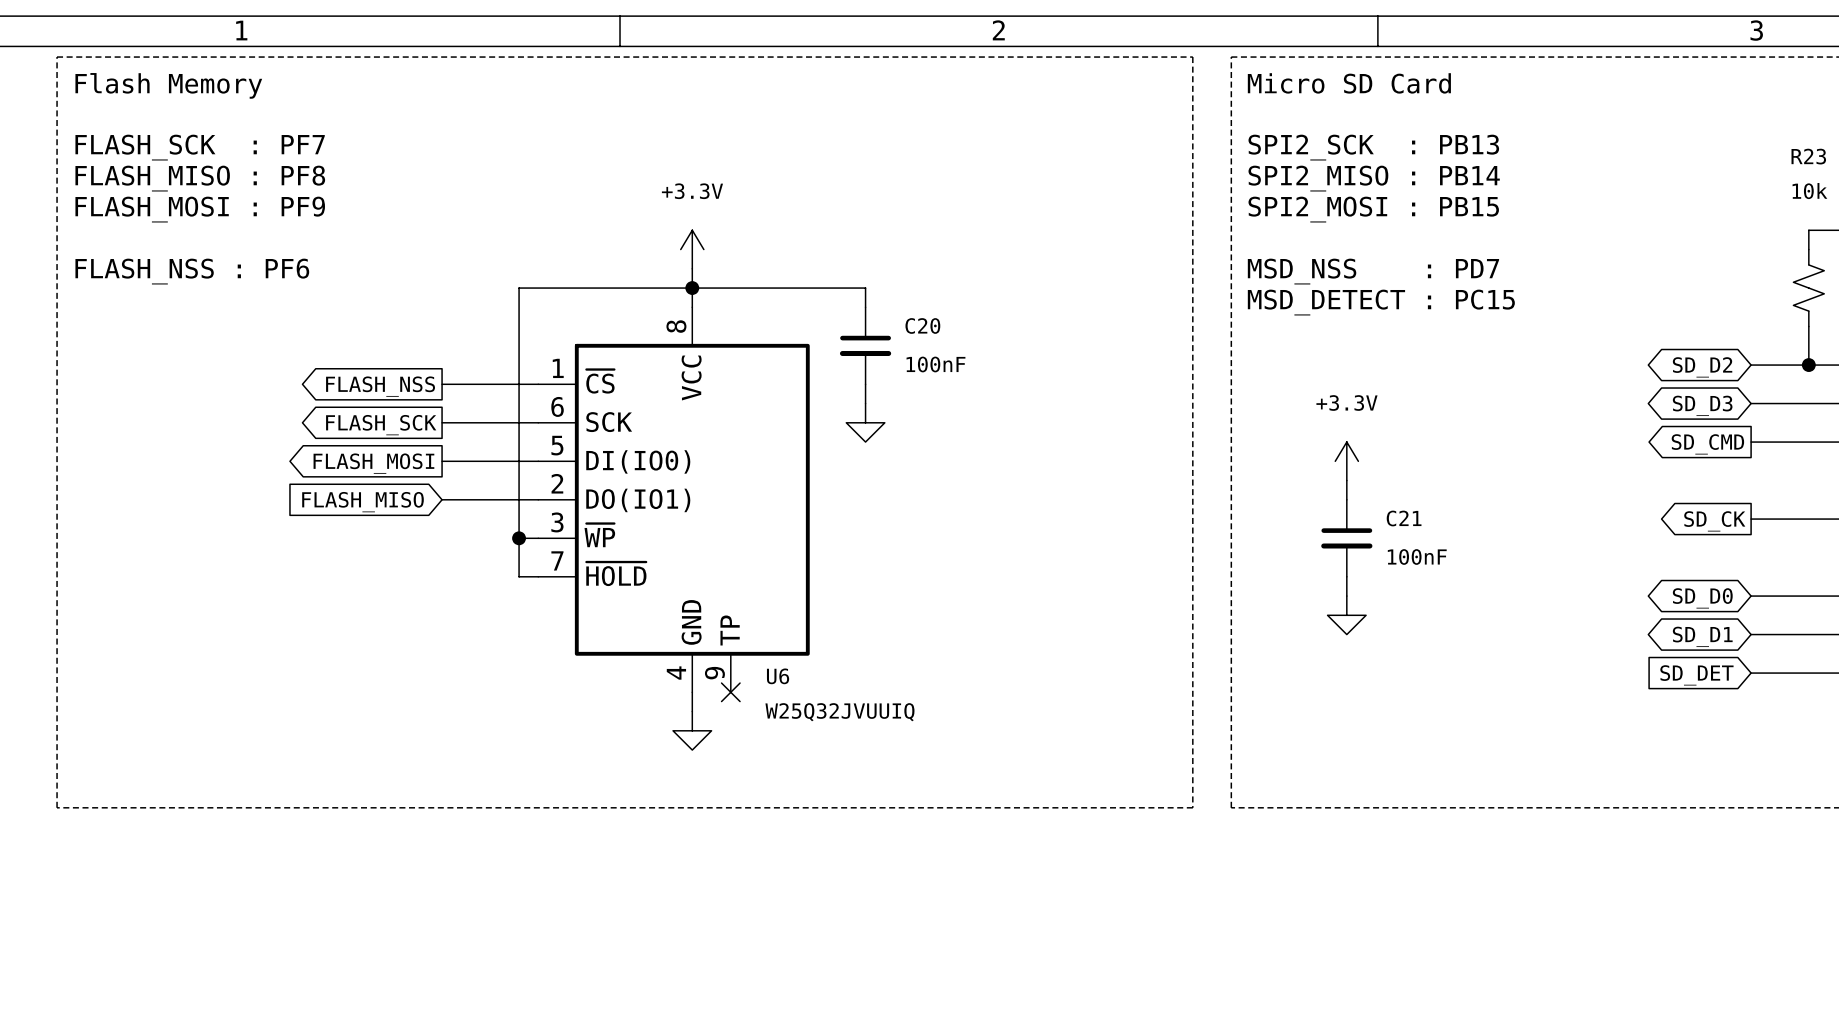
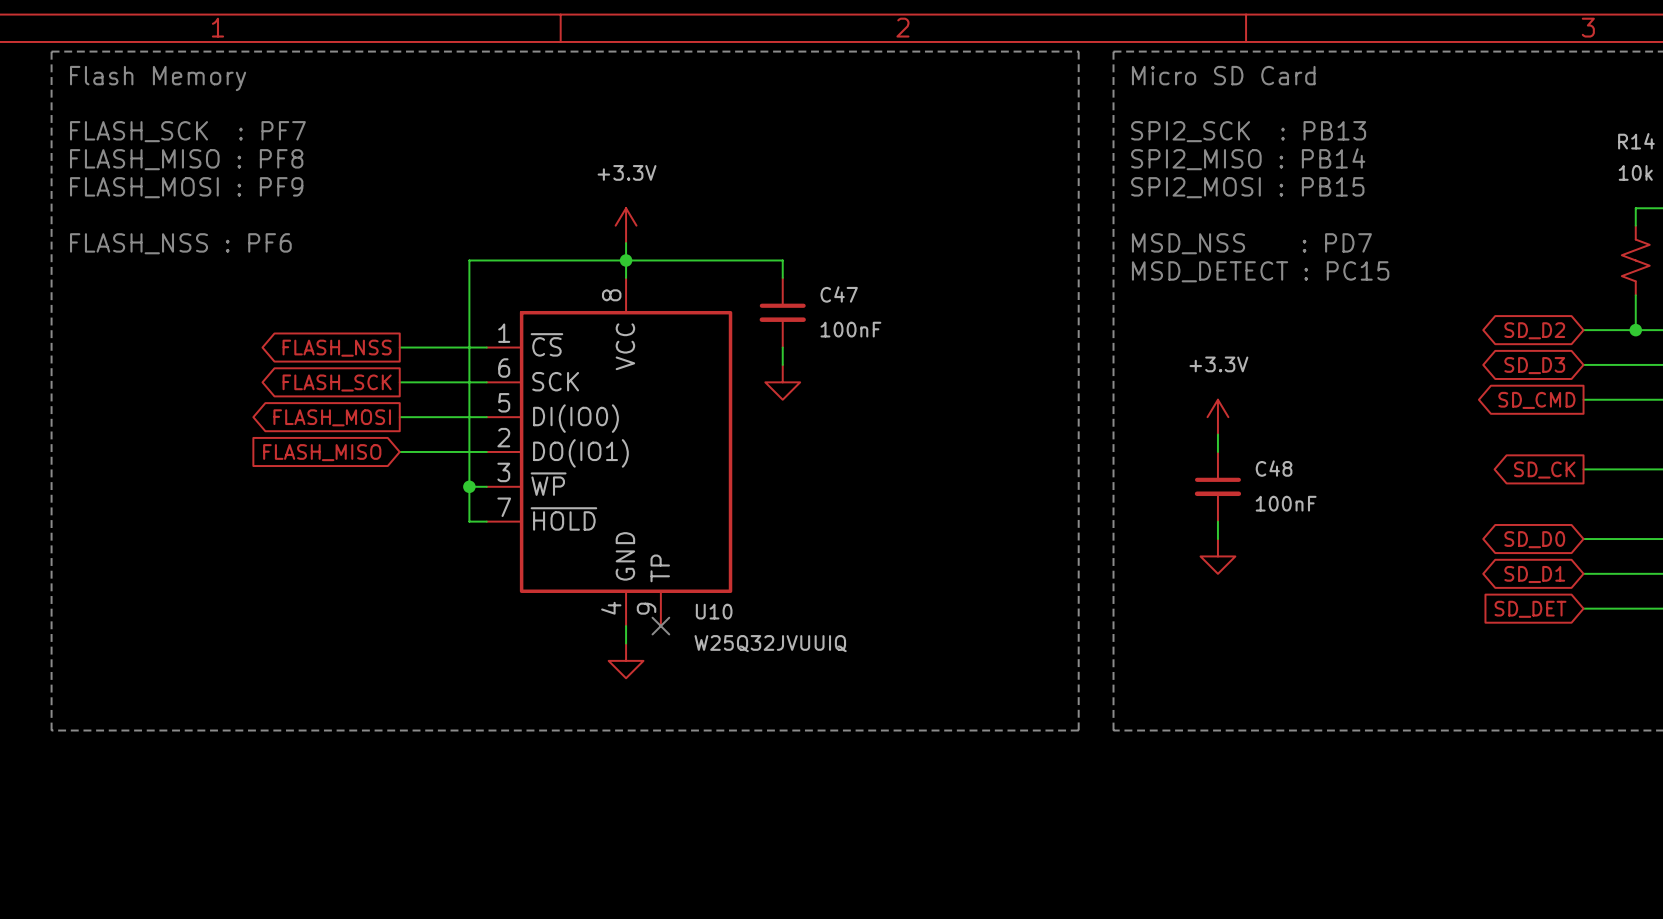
R23 name: R23 (1808, 156) -> R14 (1636, 141)
C20 name: C20 (922, 325) -> C47 (839, 294)
C21 name: C21 (1404, 518) -> C48 (1274, 468)
U6 name: U6 (778, 676) -> U10 (714, 611)

